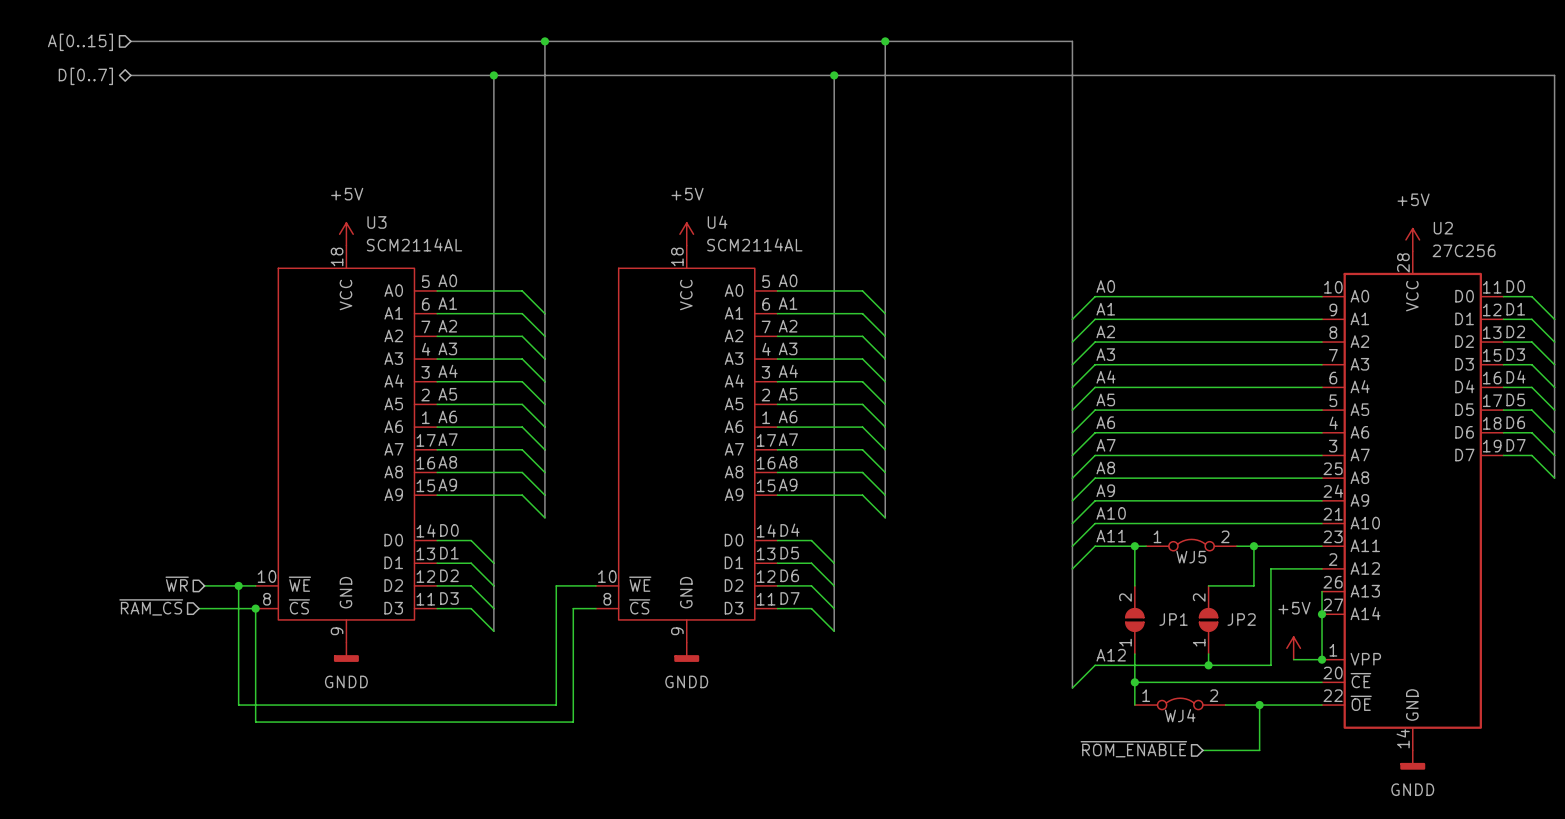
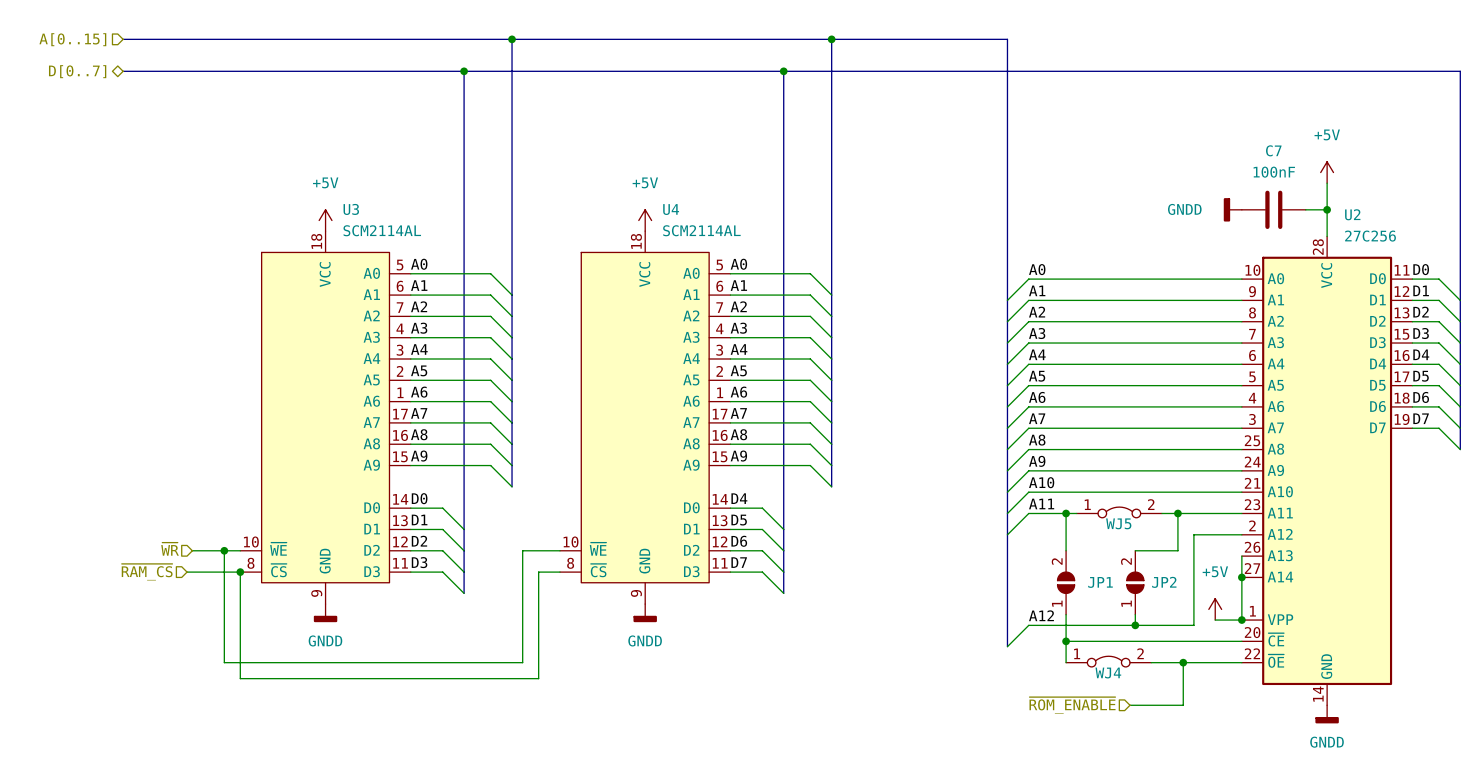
wire: none -> (1327, 183) (1327, 236)
power symbol: none -> GNDD (1232, 209)
C7: none -> 100nF (1273, 209)
wire: none -> (1305, 209) (1327, 209)
junction: none -> (1327, 209)
power symbol position: +5V (1412, 239) -> +5V (1327, 172)

